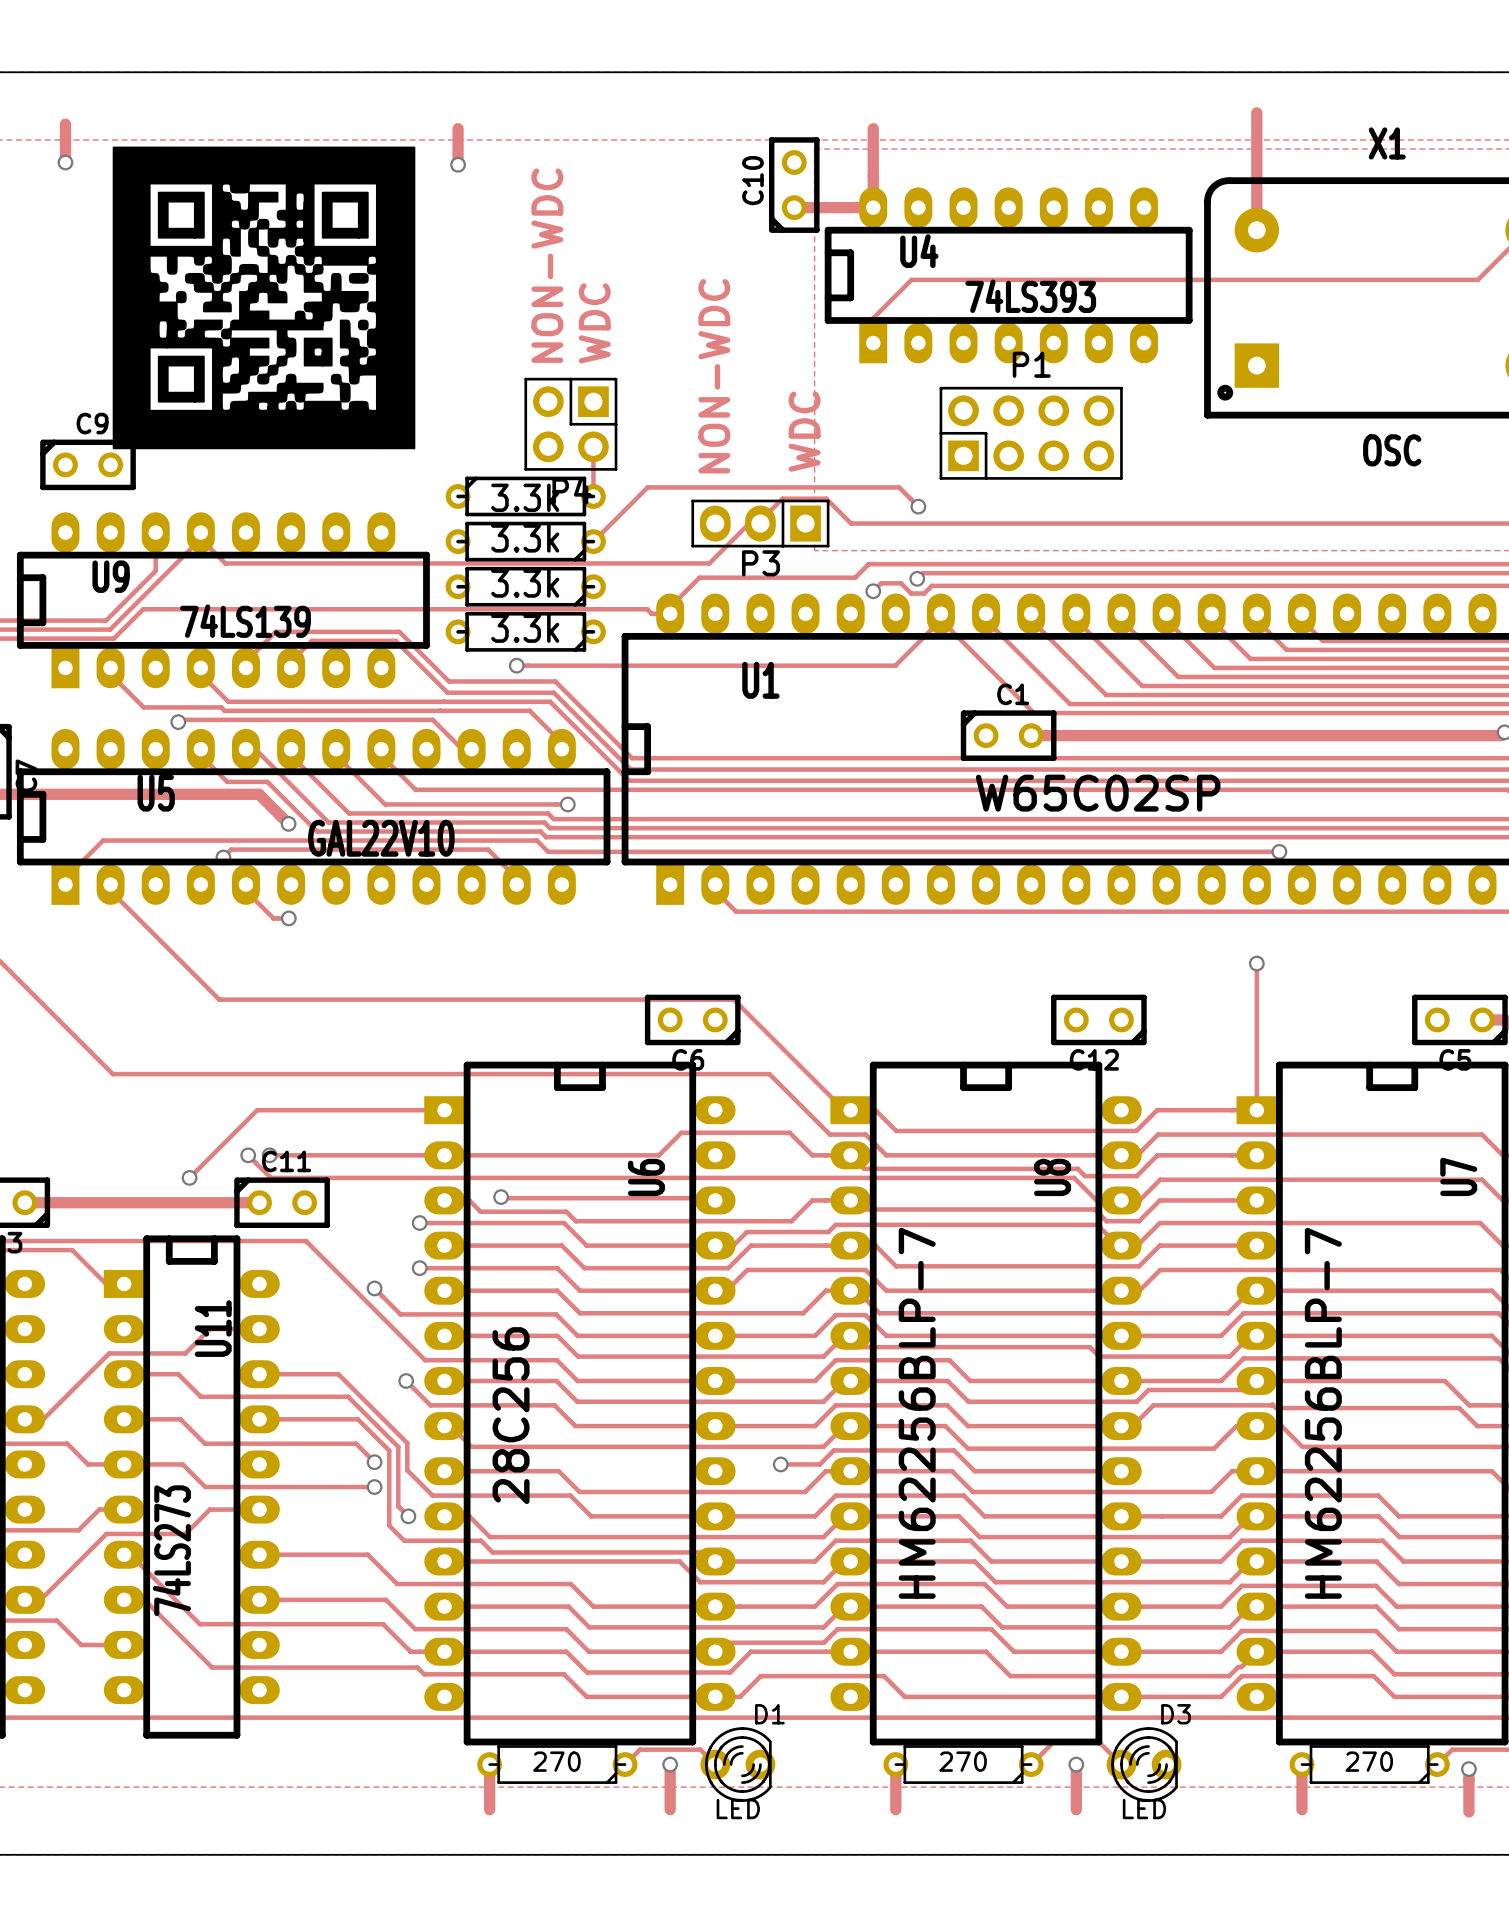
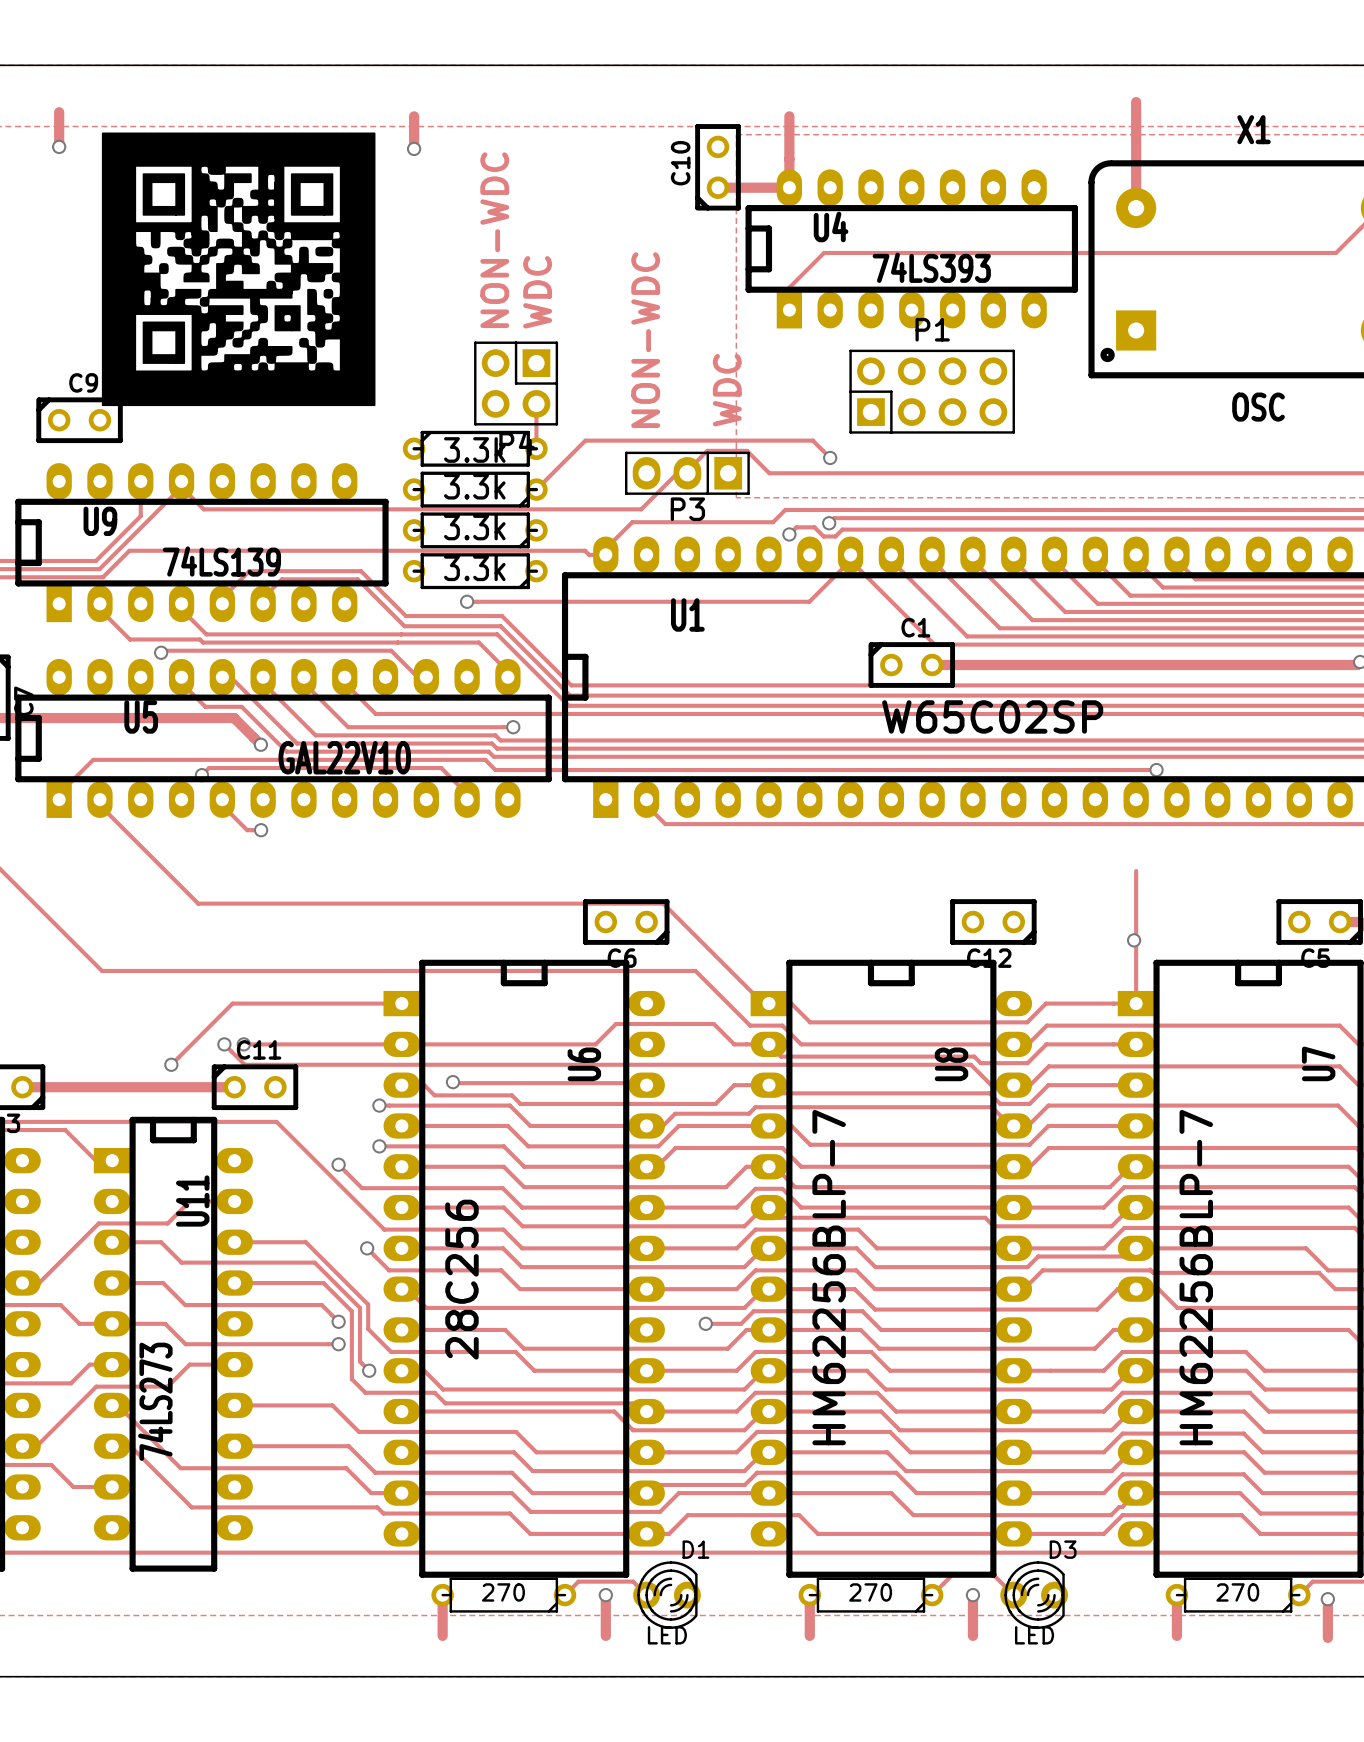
via position: (1256, 963) -> (1134, 940)

